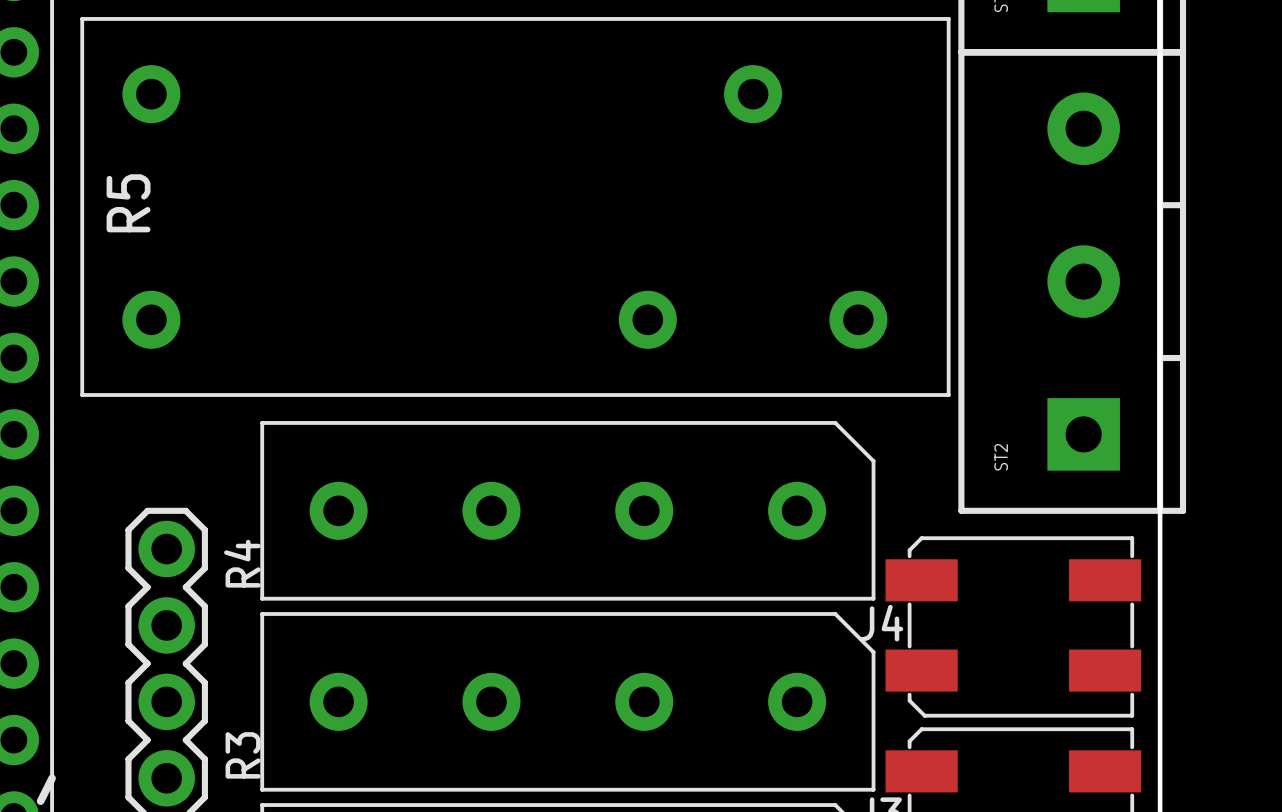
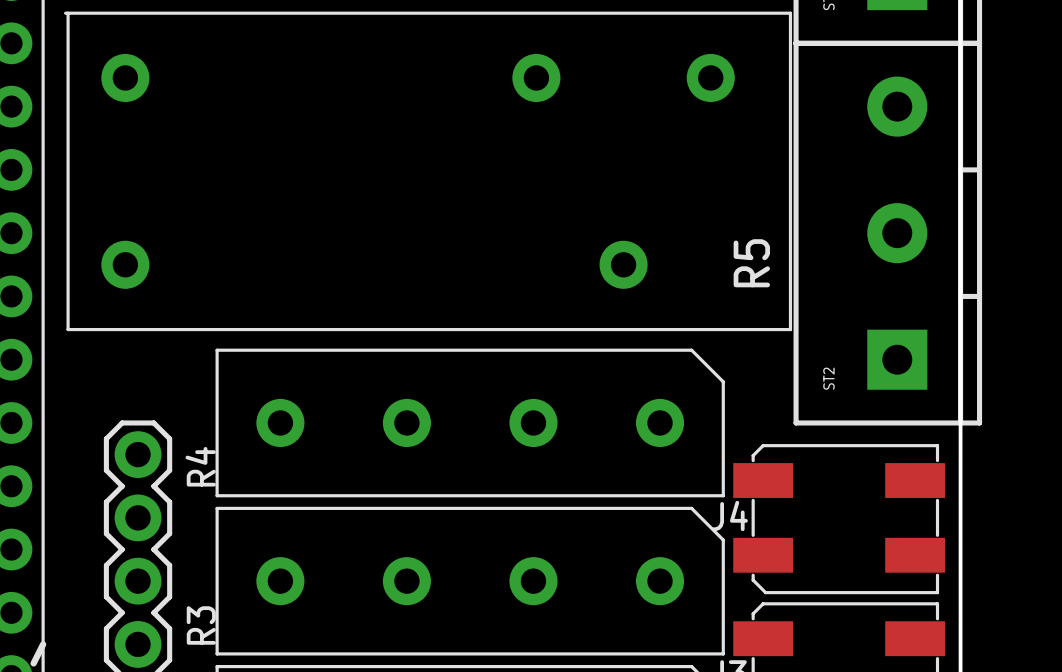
R5 footprint: [80, 17, 951, 397] -> [64, 11, 793, 332]
R5 name position: R5 (128, 203) -> R5 (751, 263)

